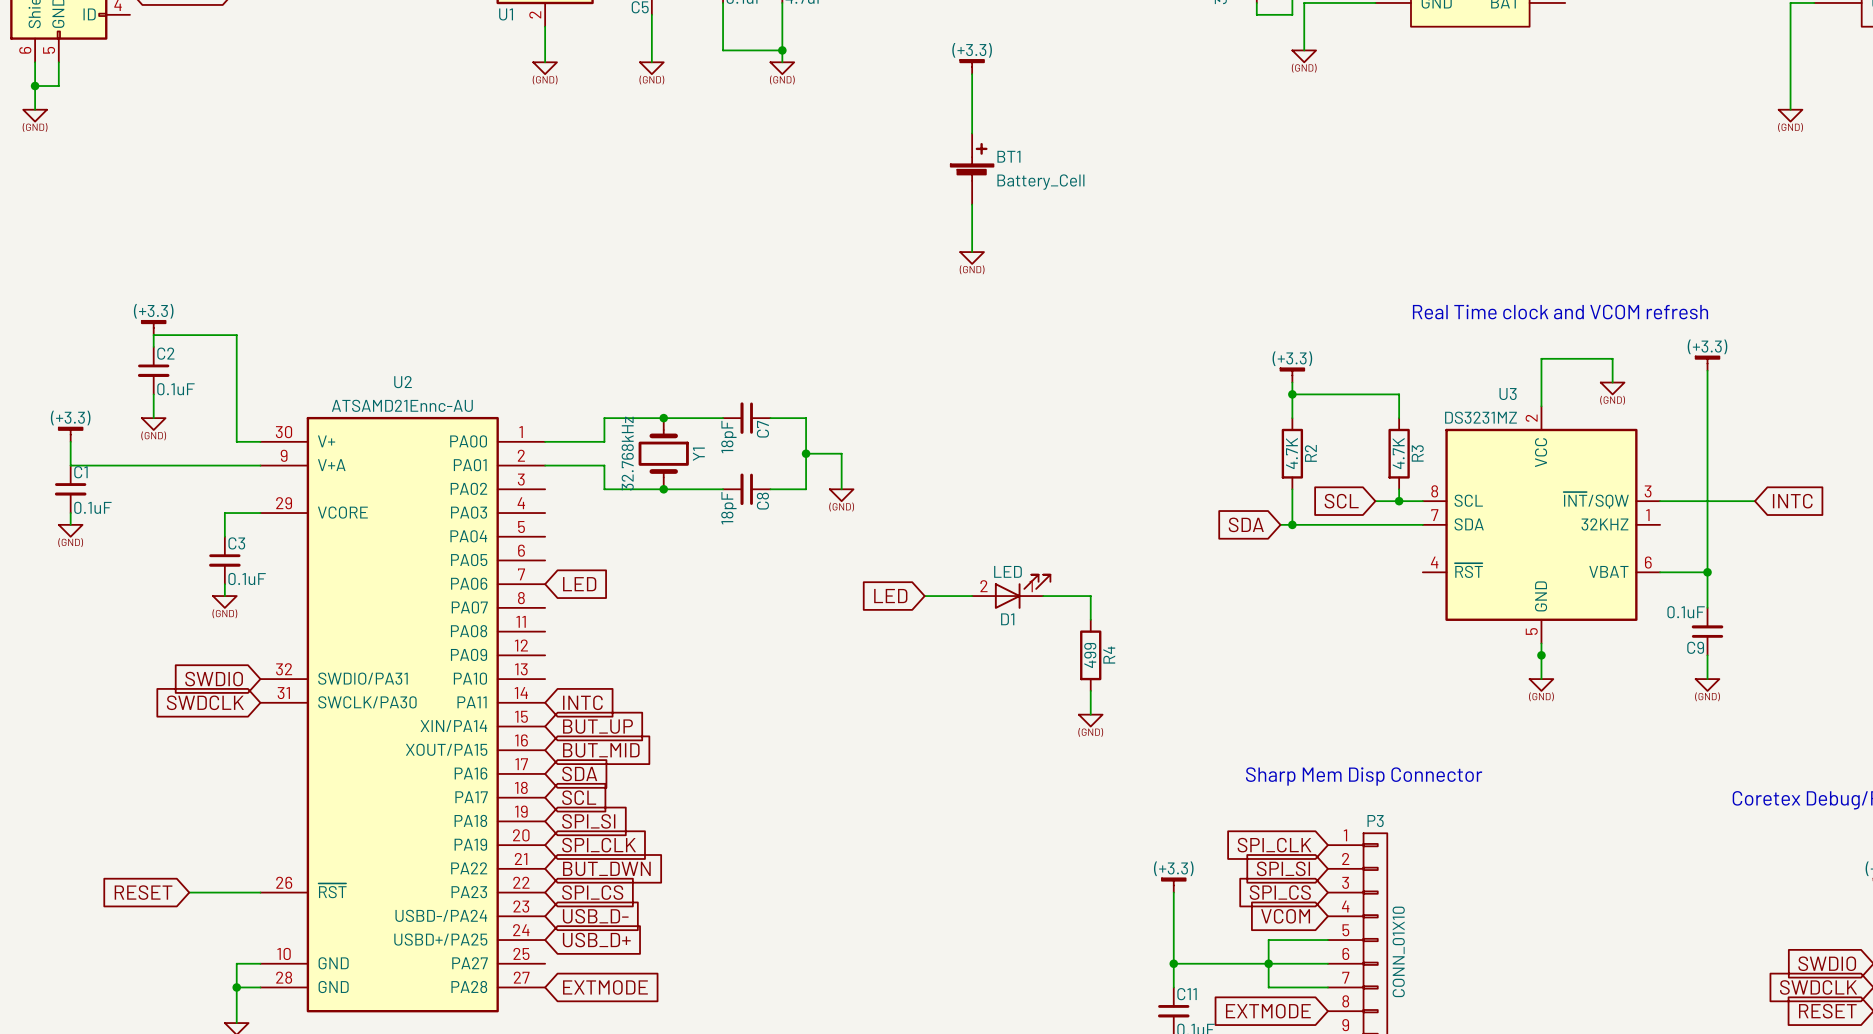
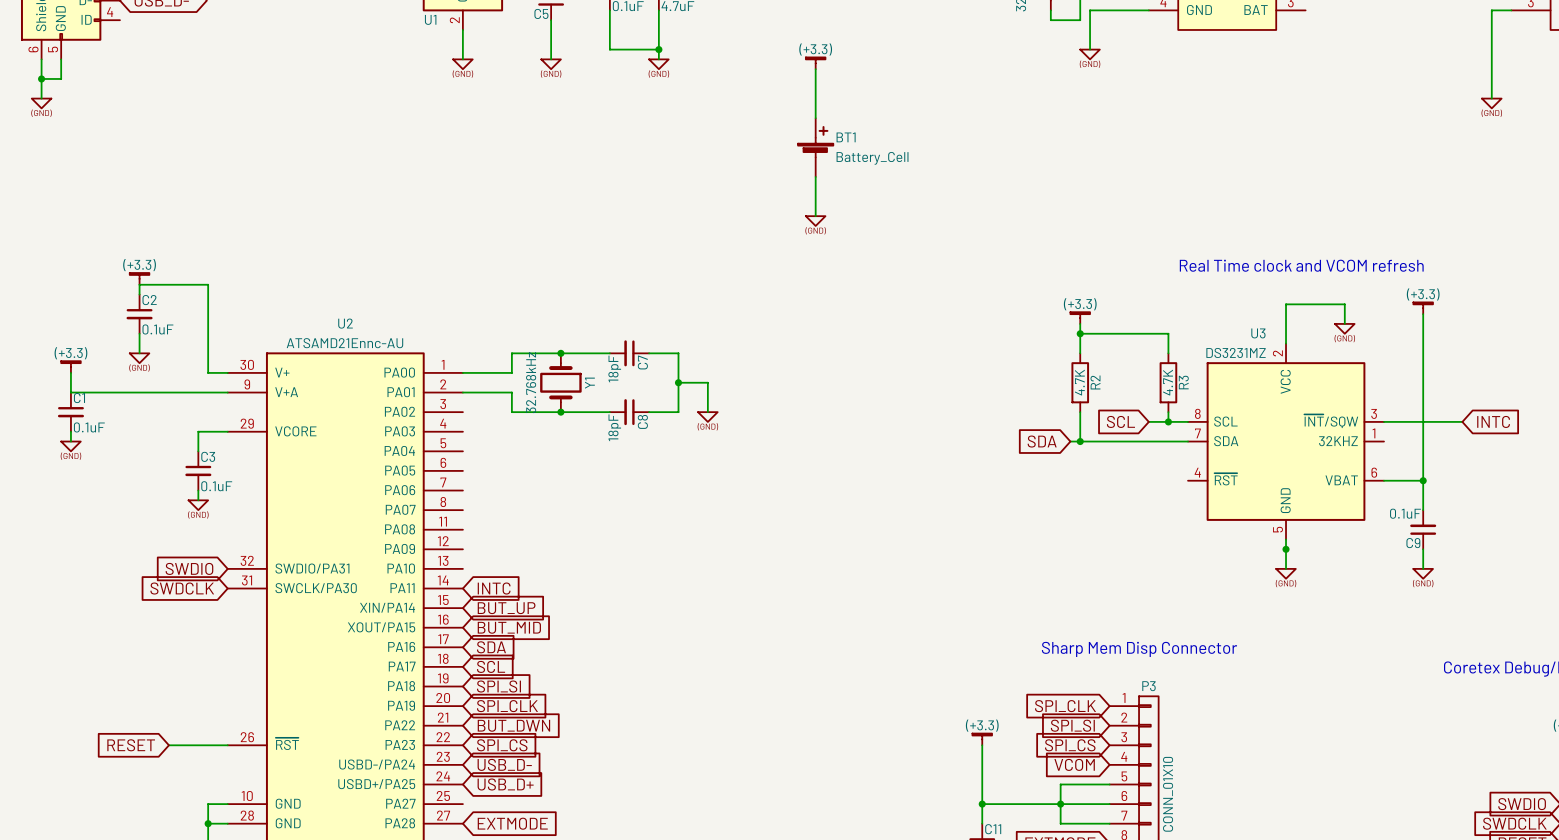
global label: LED (579, 584) -> none
D1: LED (1011, 591) -> none
global label: LED (890, 596) -> none
wire: (924, 596) (972, 596) -> none
wire: (1043, 596) (1090, 596) (1090, 619) -> none
R4: 499 (1090, 655) -> none
wire: (1090, 690) (1090, 714) -> none
power symbol: (1090, 720) -> none

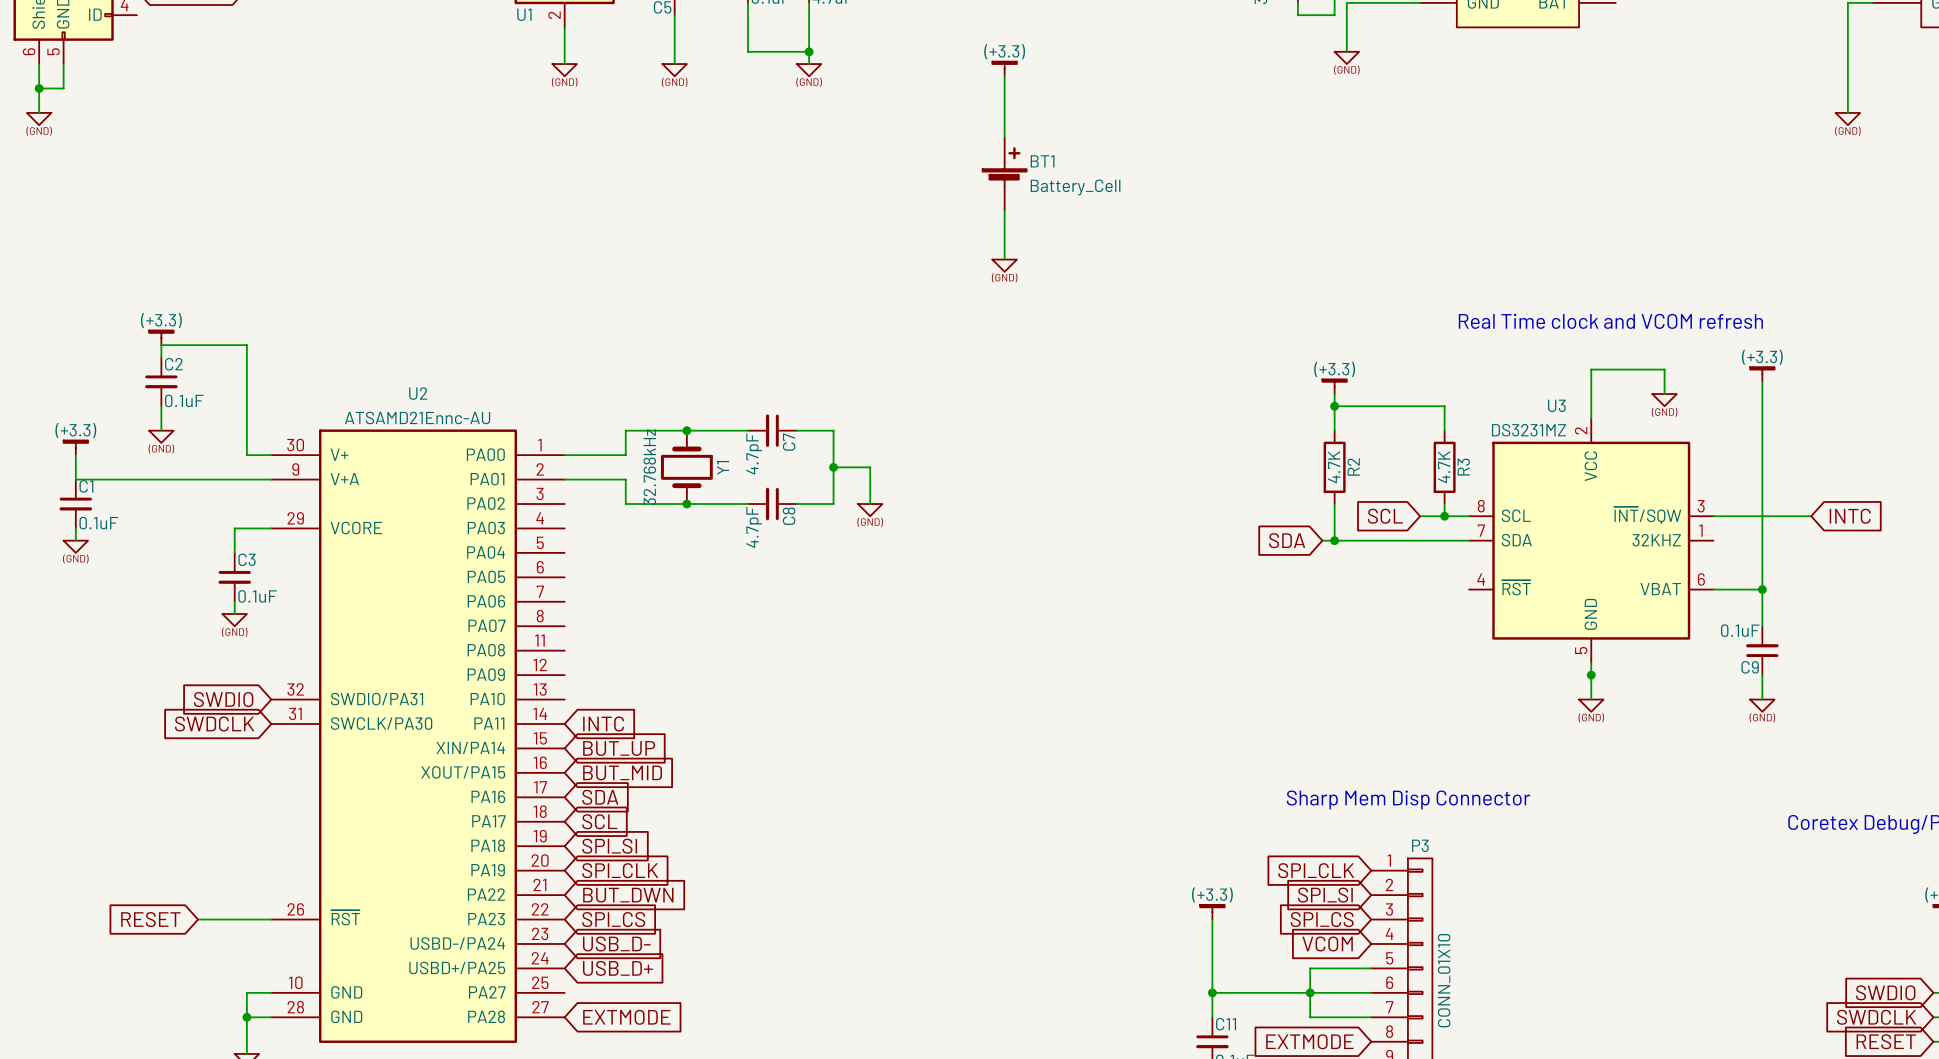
C7 value: 18pF (614, 368) -> 4.7pF (754, 454)
C8 value: 18pF (614, 427) -> 4.7pF (754, 527)

